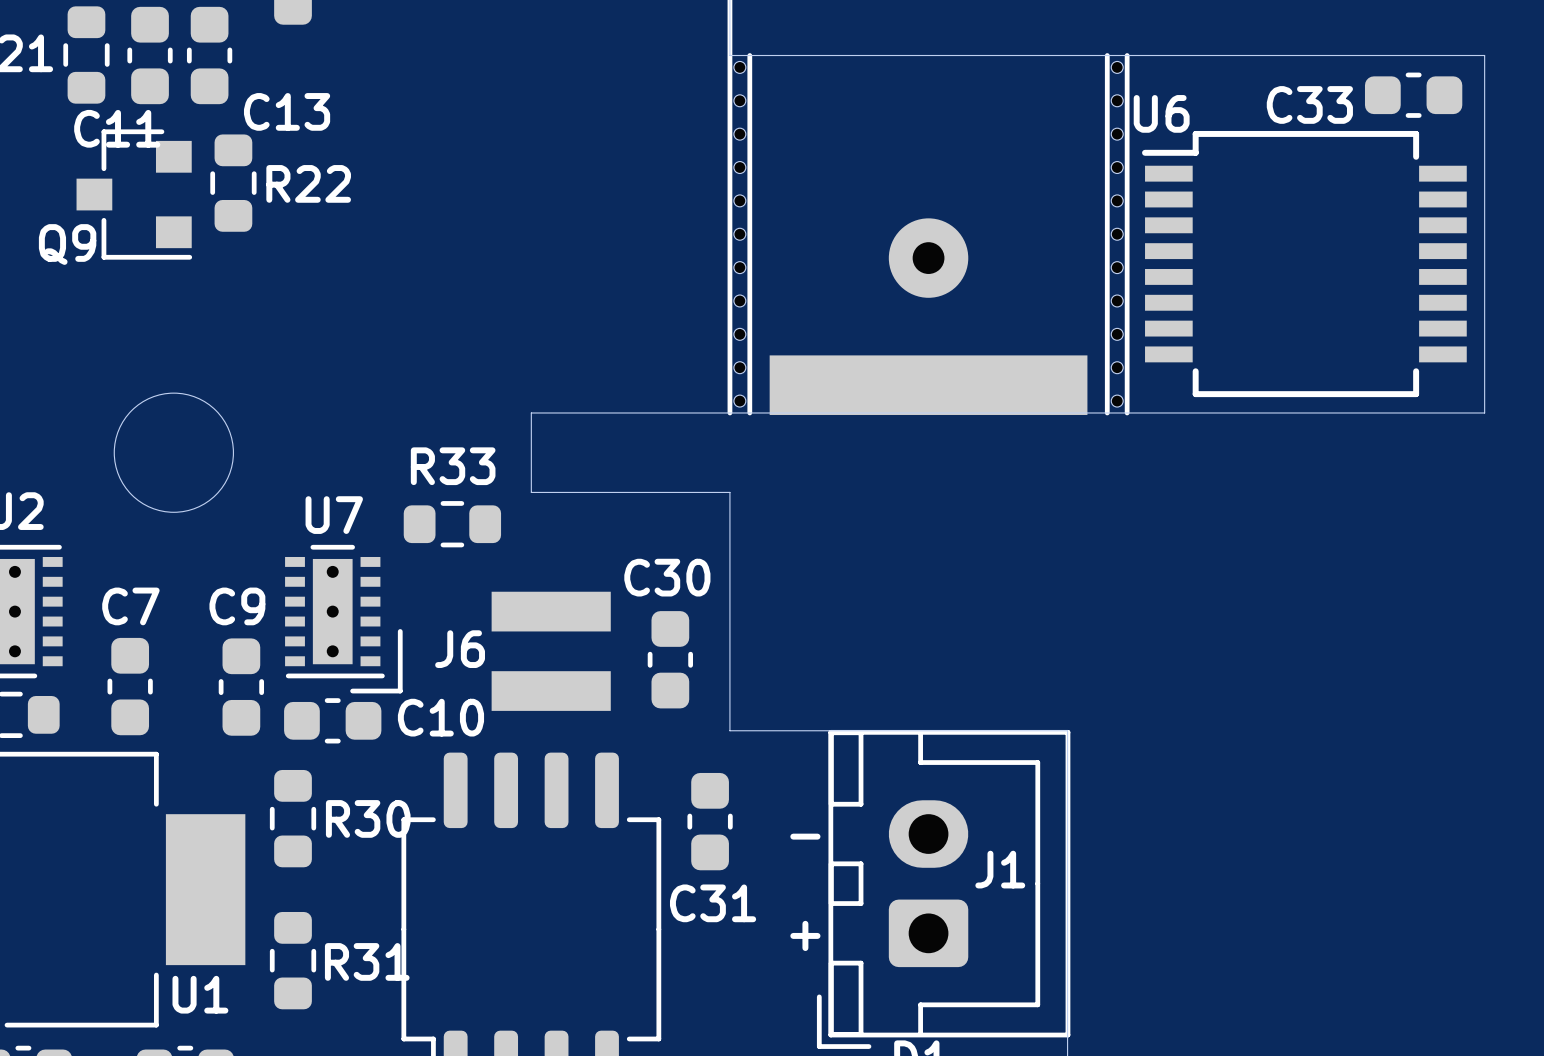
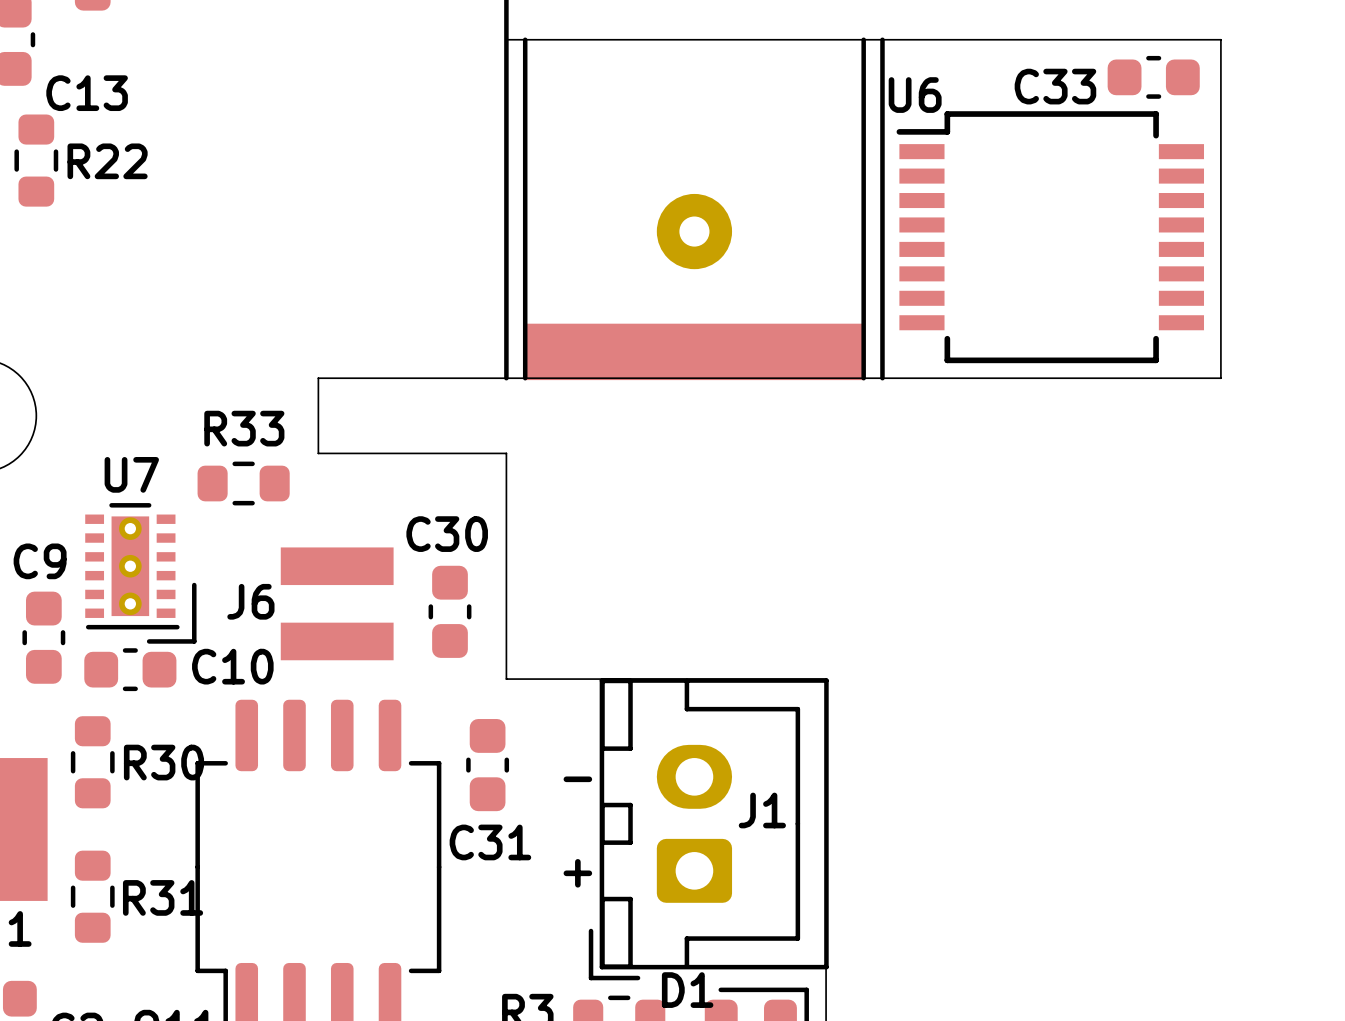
part: (739, 234) -> none
part: (1117, 234) -> none
part footprint: [769, 355, 1088, 415] -> [525, 323, 864, 381]

